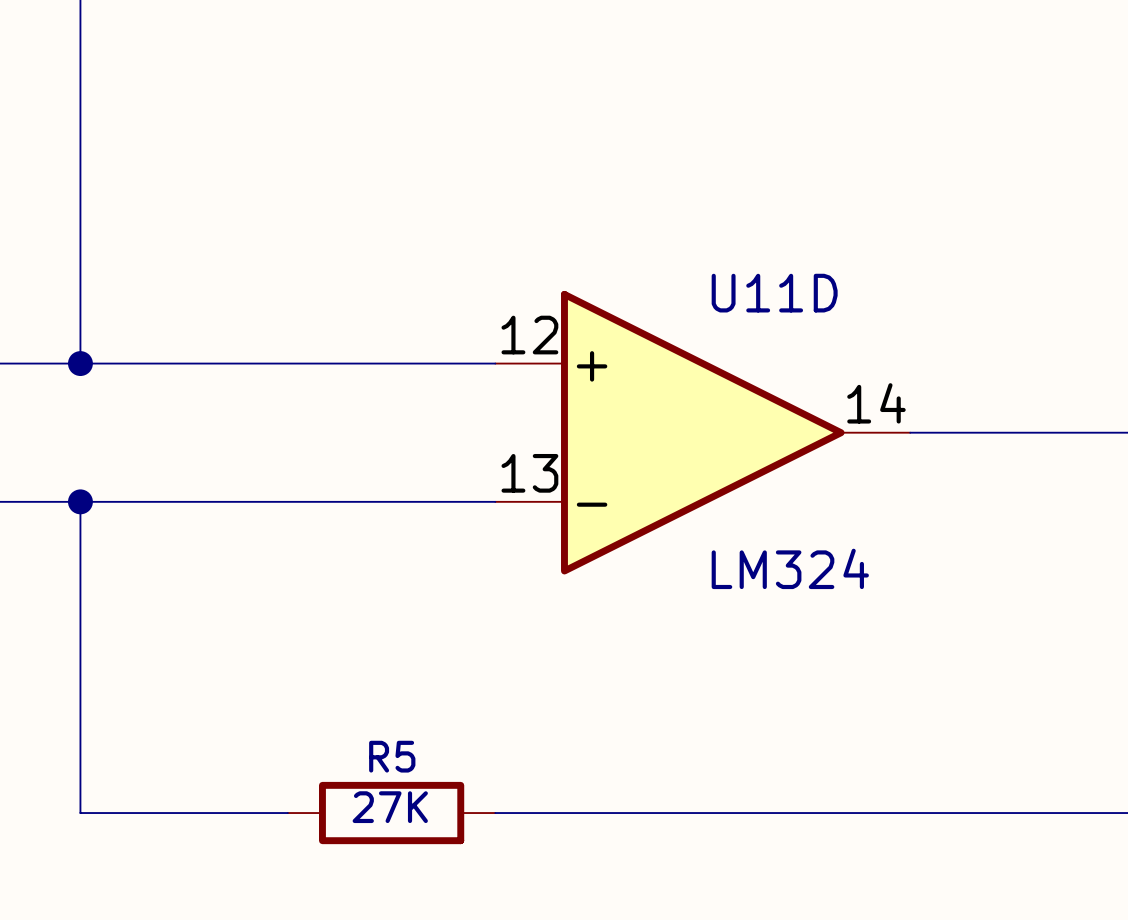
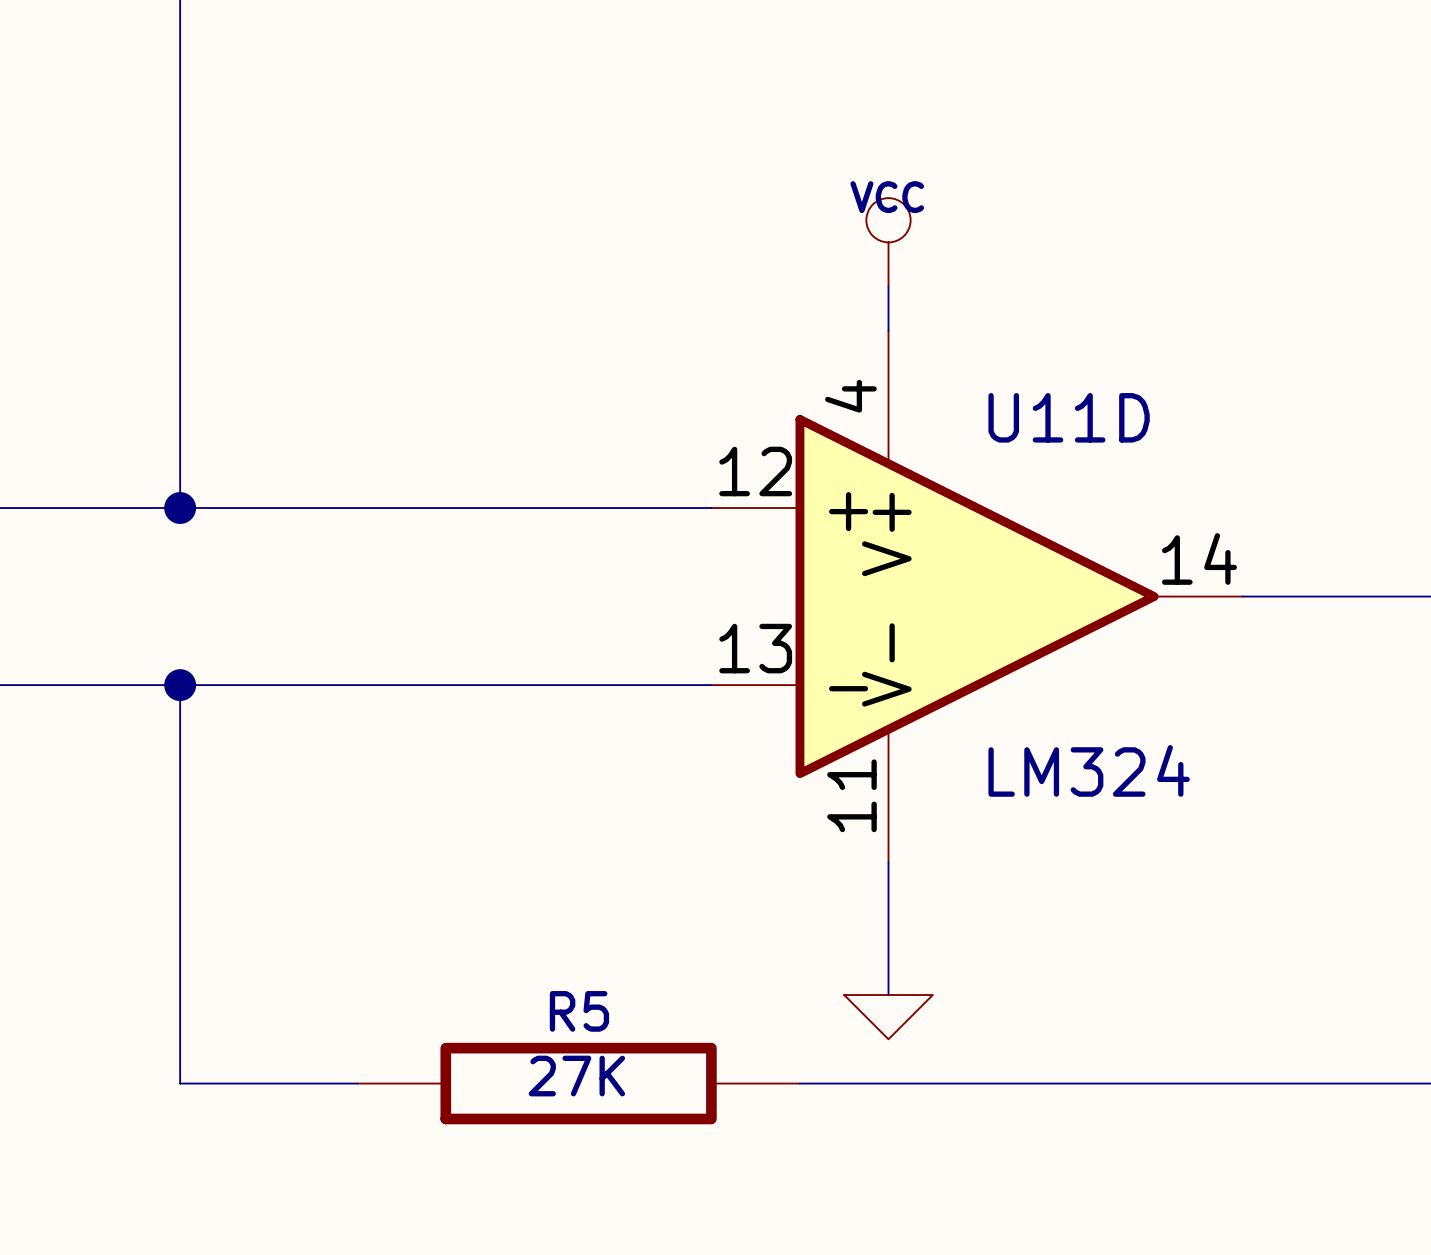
power symbol: none -> VCC (888, 242)
wire: none -> (888, 286) (888, 330)
U11D symbol: [495, 290, 911, 575] -> [711, 330, 1243, 863]
wire: none -> (888, 862) (888, 995)
power symbol: none -> (888, 1017)
R5 symbol: [287, 781, 496, 845] -> [357, 1042, 800, 1125]

